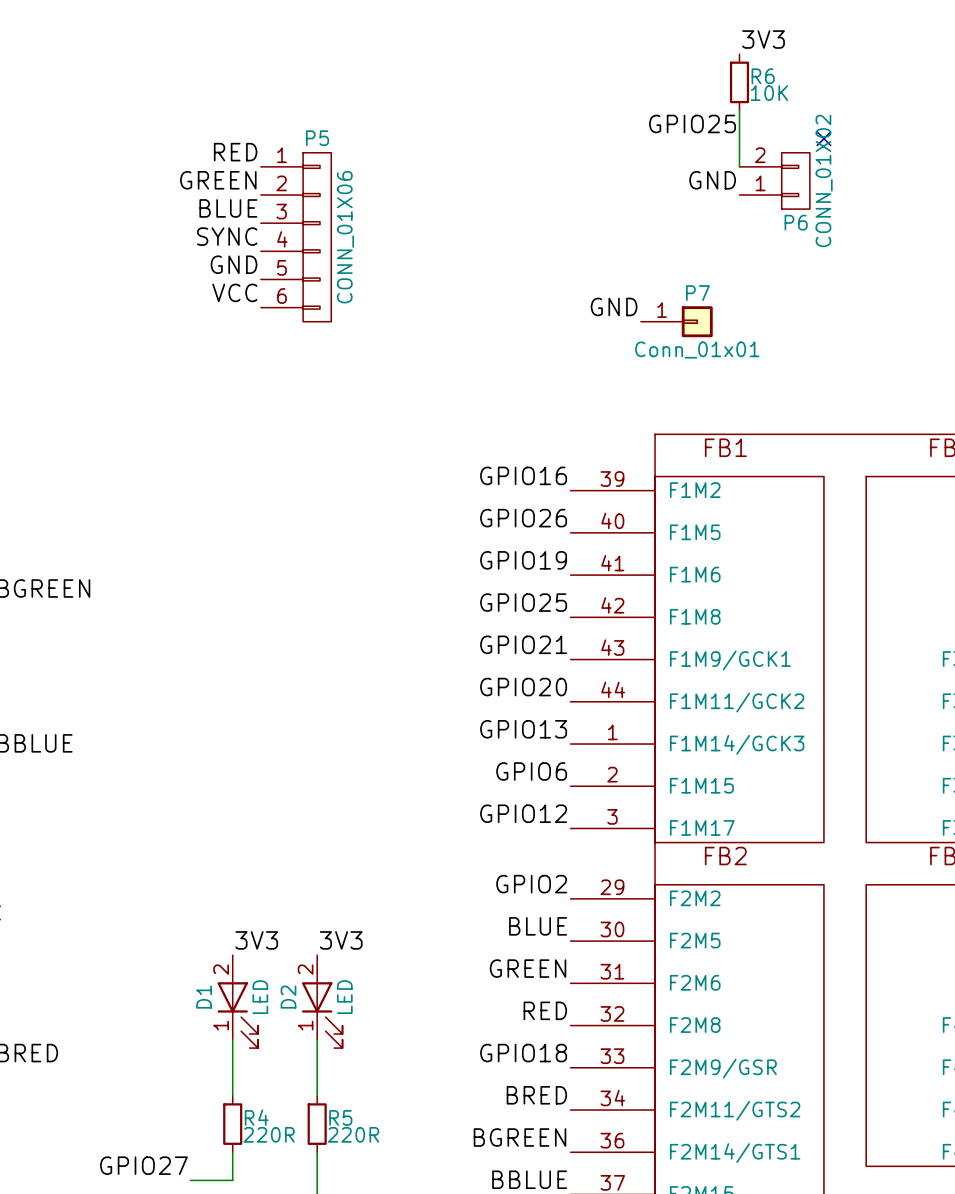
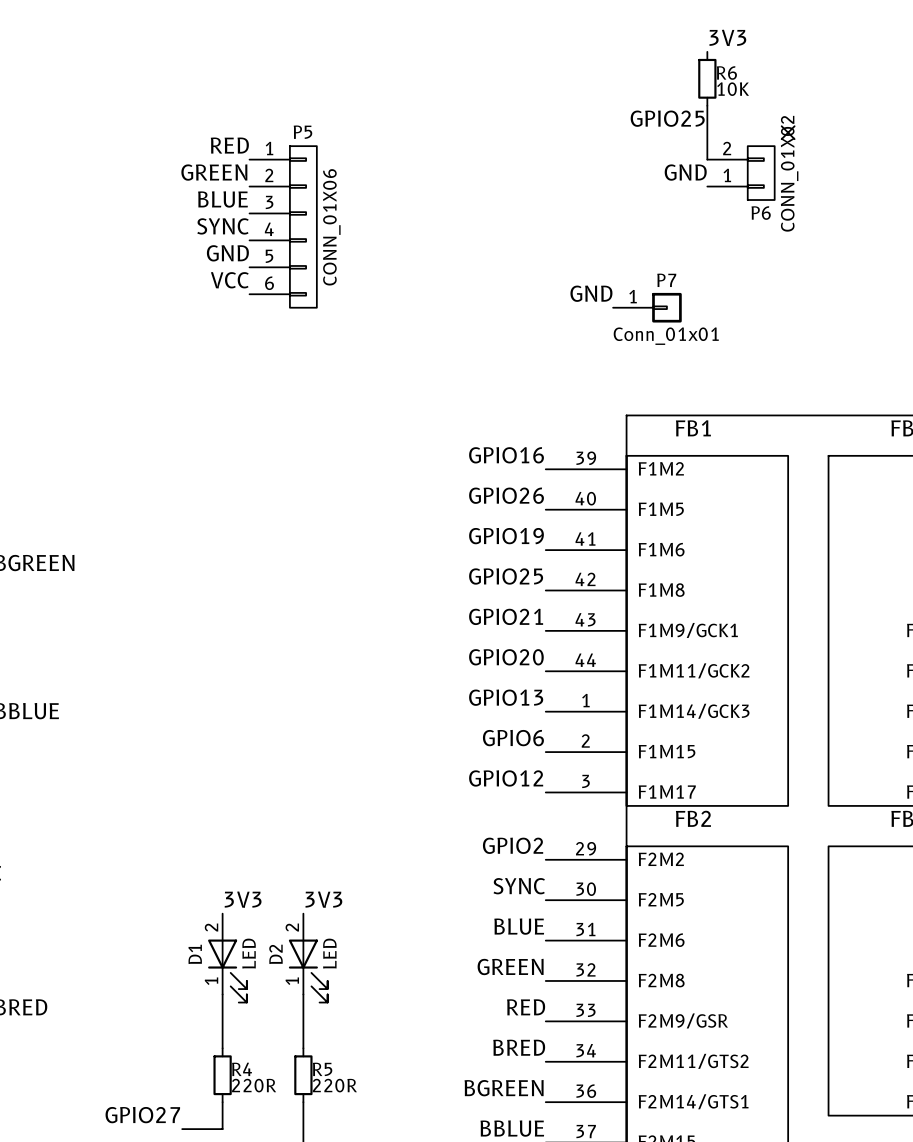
label: BLUE (538, 926) -> SYNC (519, 886)
label: GREEN (528, 968) -> BLUE (519, 926)
label: RED (545, 1010) -> GREEN (510, 966)
label: GPIO18 (523, 1053) -> RED (526, 1007)

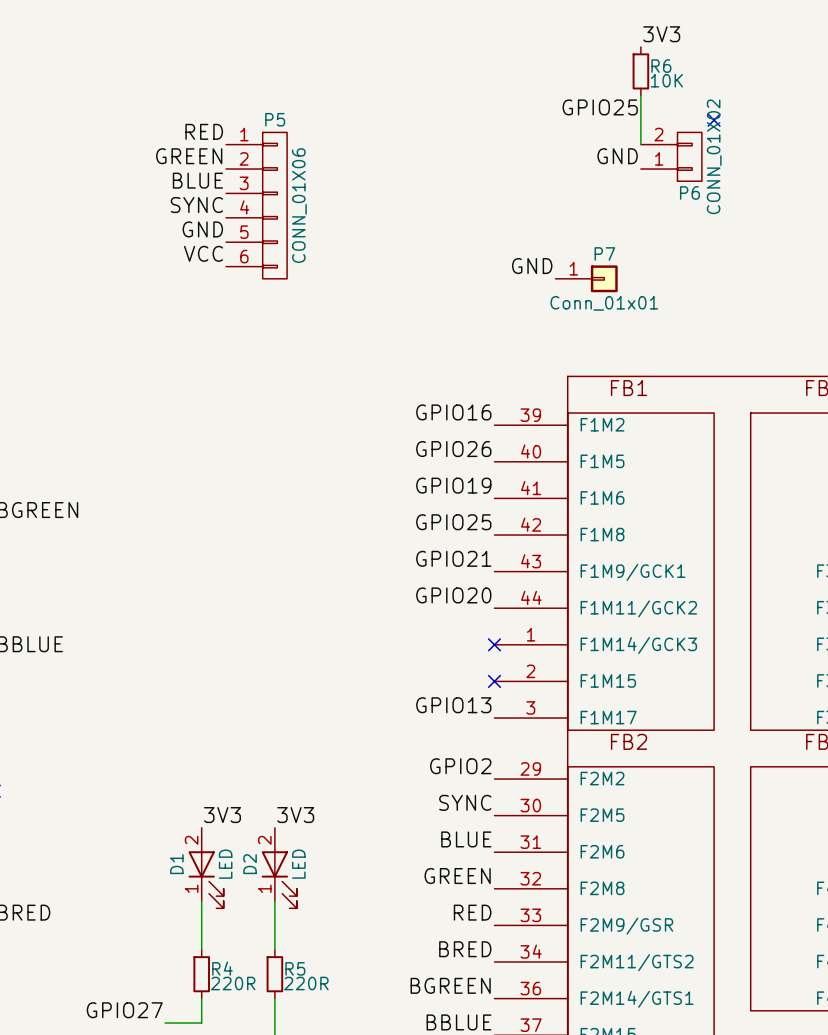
label: GPIO13 (506, 697) -> none
no-connect mark: none -> (494, 644)
label: GPIO6 (513, 738) -> none
no-connect mark: none -> (494, 681)
label: GPIO12 (506, 778) -> GPIO13 (453, 705)

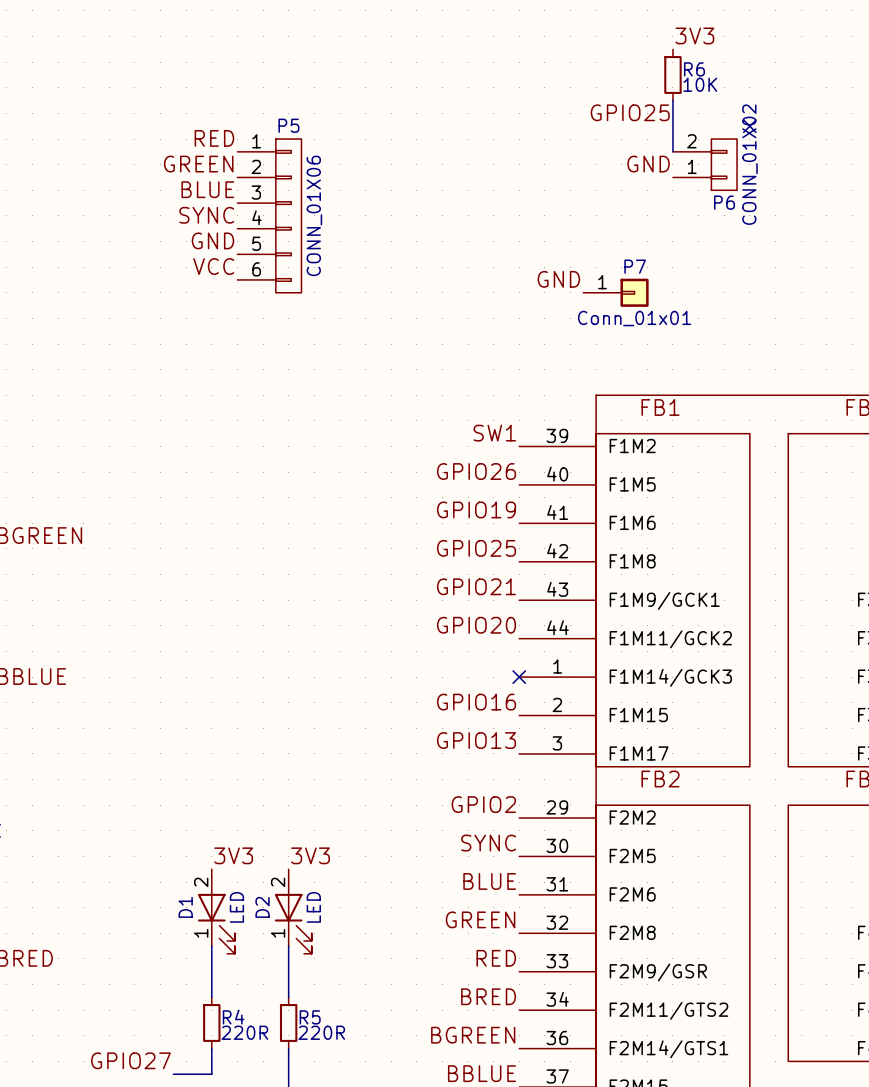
label: GPIO16 (453, 412) -> SW1 (494, 433)
label: none -> GPIO16 (476, 702)
no-connect mark: (494, 681) -> none

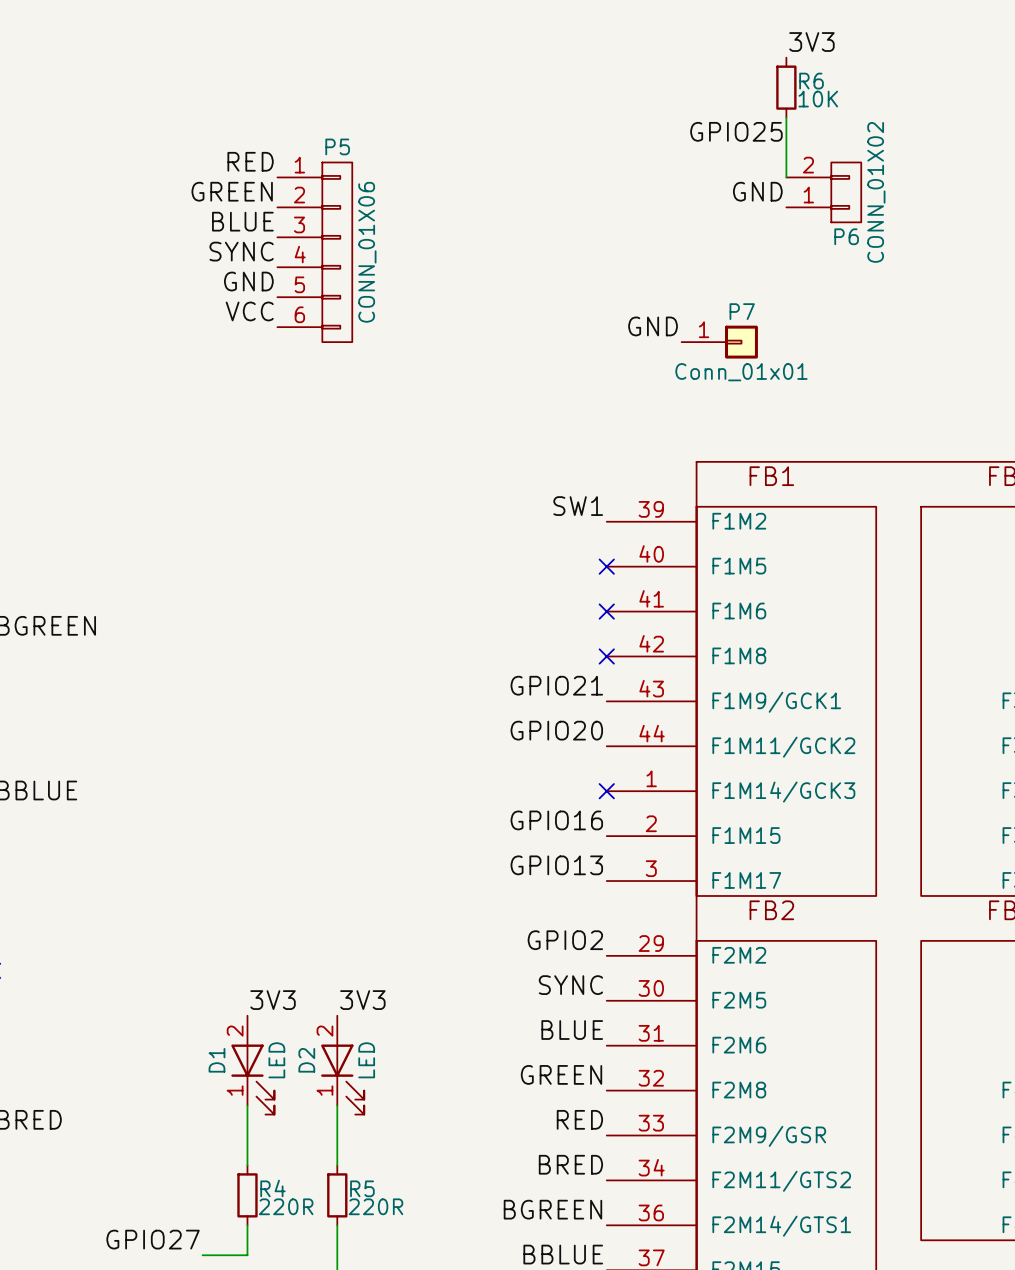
no-connect mark: (749, 126) -> none
label: GPIO26 (476, 471) -> none
no-connect mark: none -> (606, 566)
label: GPIO19 (476, 509) -> none
no-connect mark: none -> (606, 611)
label: GPIO25 (476, 548) -> none
no-connect mark: none -> (606, 656)

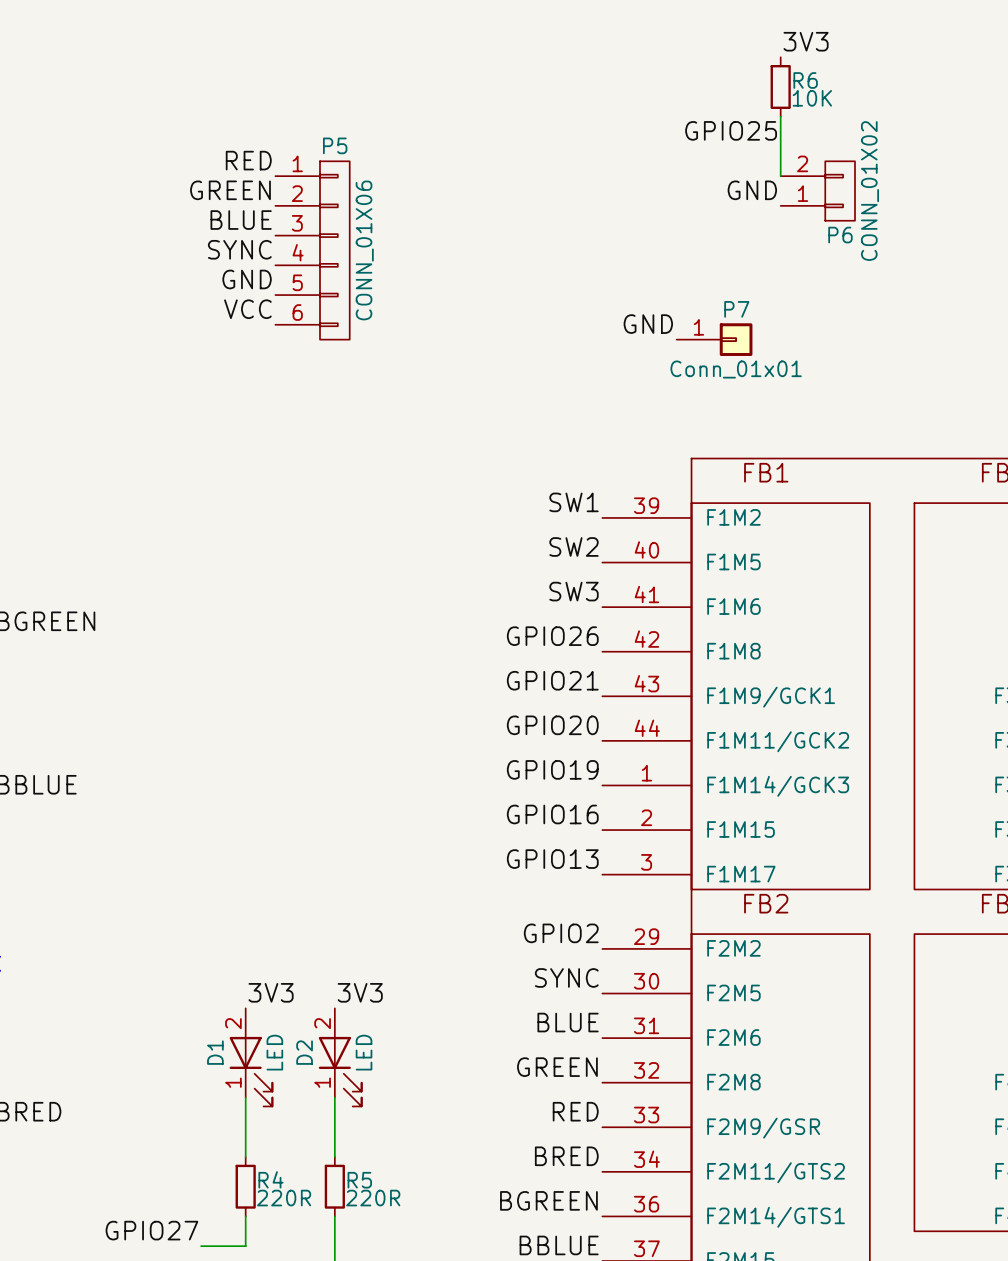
label: none -> SW2 (574, 546)
no-connect mark: (606, 566) -> none
label: none -> SW3 (574, 591)
no-connect mark: (606, 611) -> none
label: none -> GPIO26 (552, 636)
no-connect mark: (606, 656) -> none
label: none -> GPIO19 (552, 769)
no-connect mark: (606, 791) -> none

